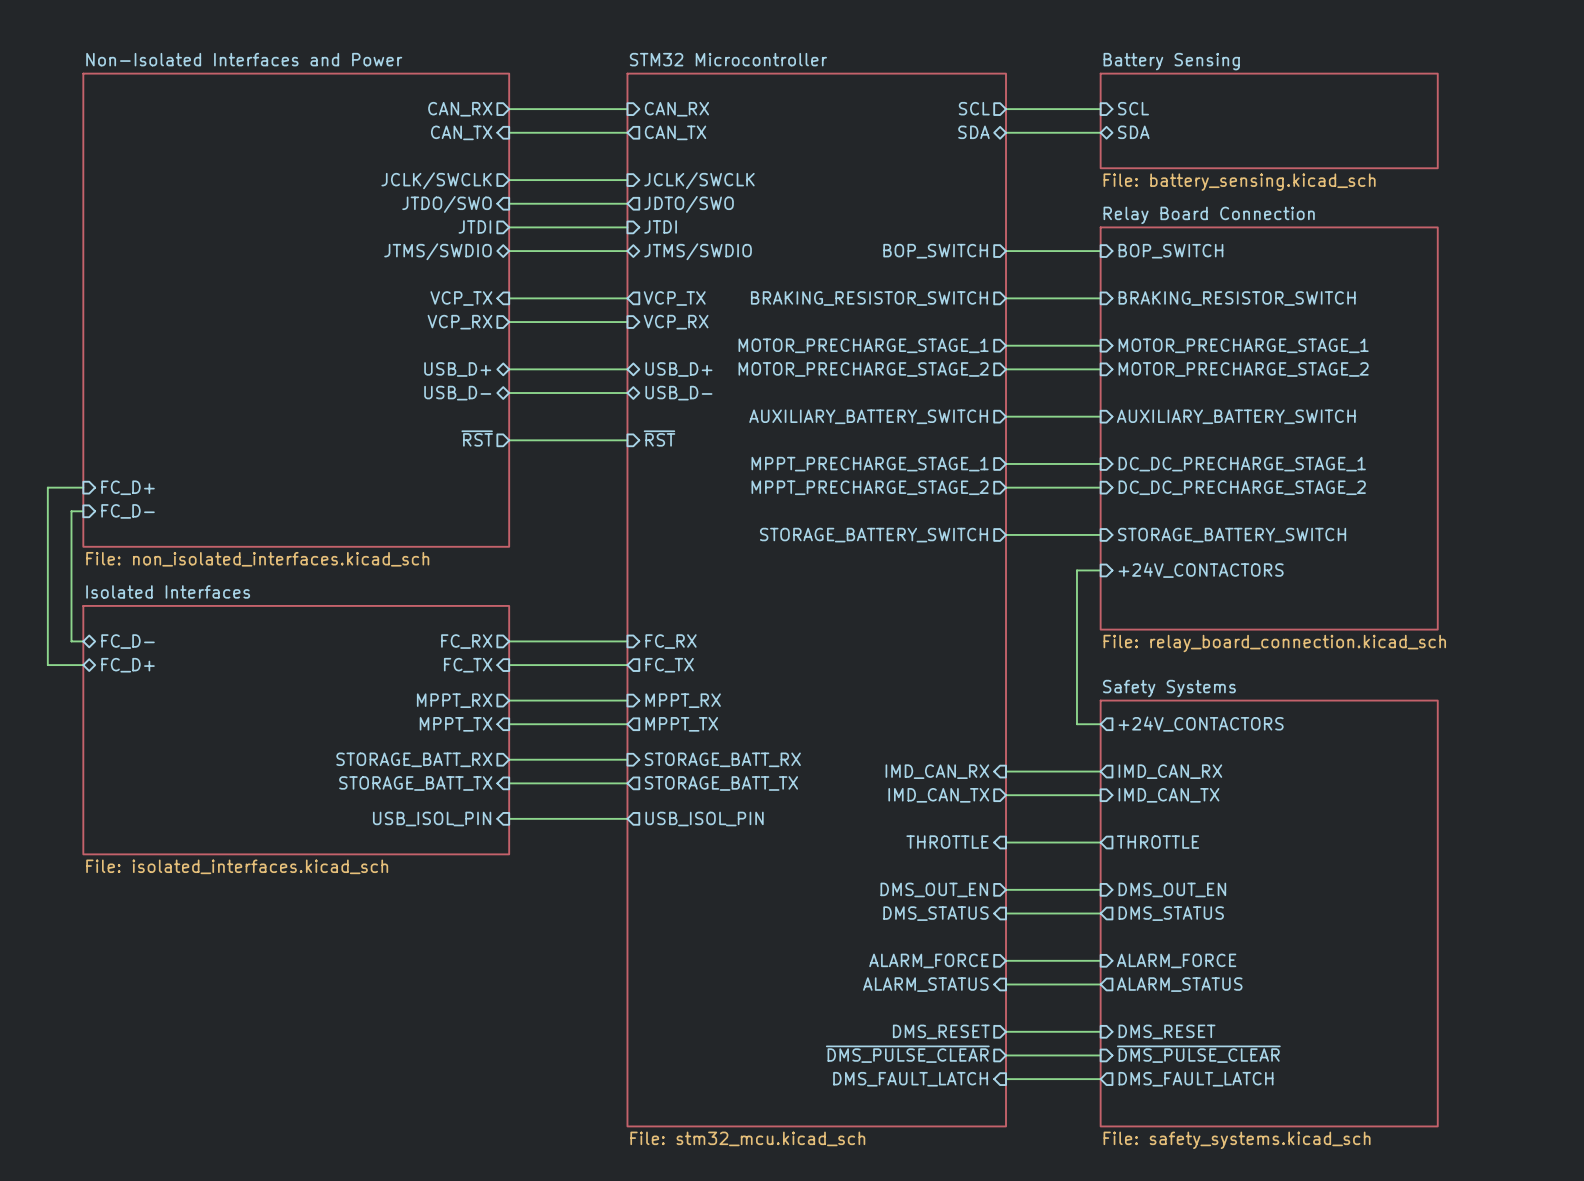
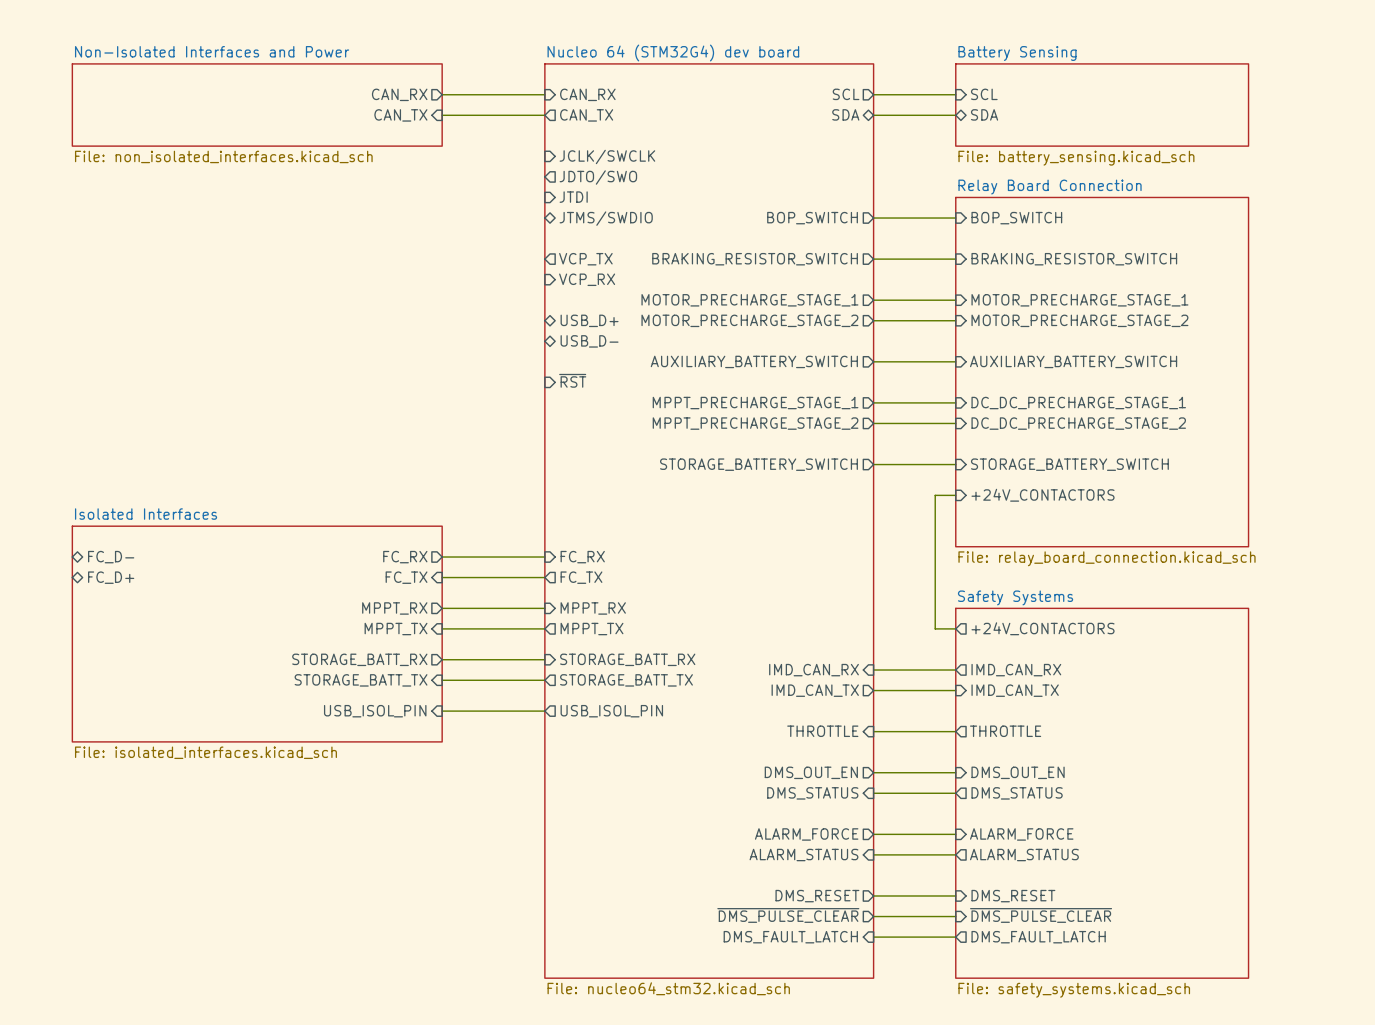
sheet STM32 Microcontroller name: STM32 Microcontroller (728, 59) -> Nucleo 64 (STM32G4) dev board (673, 53)
sheet Non-Isolated Interfaces and Power: none -> File: non_isolated_interfaces.kicad_sch (257, 105)
sheet pin: JCLK/SWCLK (436, 180) -> none
wire: (509, 180) (627, 180) -> none
wire: (509, 203) (627, 203) -> none
sheet pin: JTDO/SWO (447, 204) -> none
sheet pin: JTDI (474, 226) -> none
wire: (509, 227) (627, 227) -> none
sheet pin: JTMS/SWDIO (438, 251) -> none
wire: (509, 251) (627, 251) -> none
sheet pin: VCP_TX (461, 298) -> none
wire: (509, 298) (627, 298) -> none
sheet Non-Isolated Interfaces and Power: File: non_isolated_interfaces.kicad_sch (296, 310) -> none
sheet pin: VCP_RX (459, 322) -> none
wire: (509, 322) (627, 322) -> none
sheet pin: USB_D+ (457, 369) -> none
wire: (509, 369) (627, 369) -> none
sheet pin: USB_D- (457, 393) -> none
wire: (509, 393) (627, 393) -> none
sheet pin: ~{RST} (477, 438) -> none
wire: (509, 440) (627, 440) -> none
wire: (83, 487) (47, 487) (47, 665) (83, 665) -> none
sheet pin: FC_D+ (128, 487) -> none
wire: (83, 511) (71, 511) (71, 641) (83, 641) -> none
sheet pin: FC_D- (128, 511) -> none
sheet STM32 Microcontroller value: File: stm32_mcu.kicad_sch (747, 1138) -> File: nucleo64_stm32.kicad_sch (668, 988)

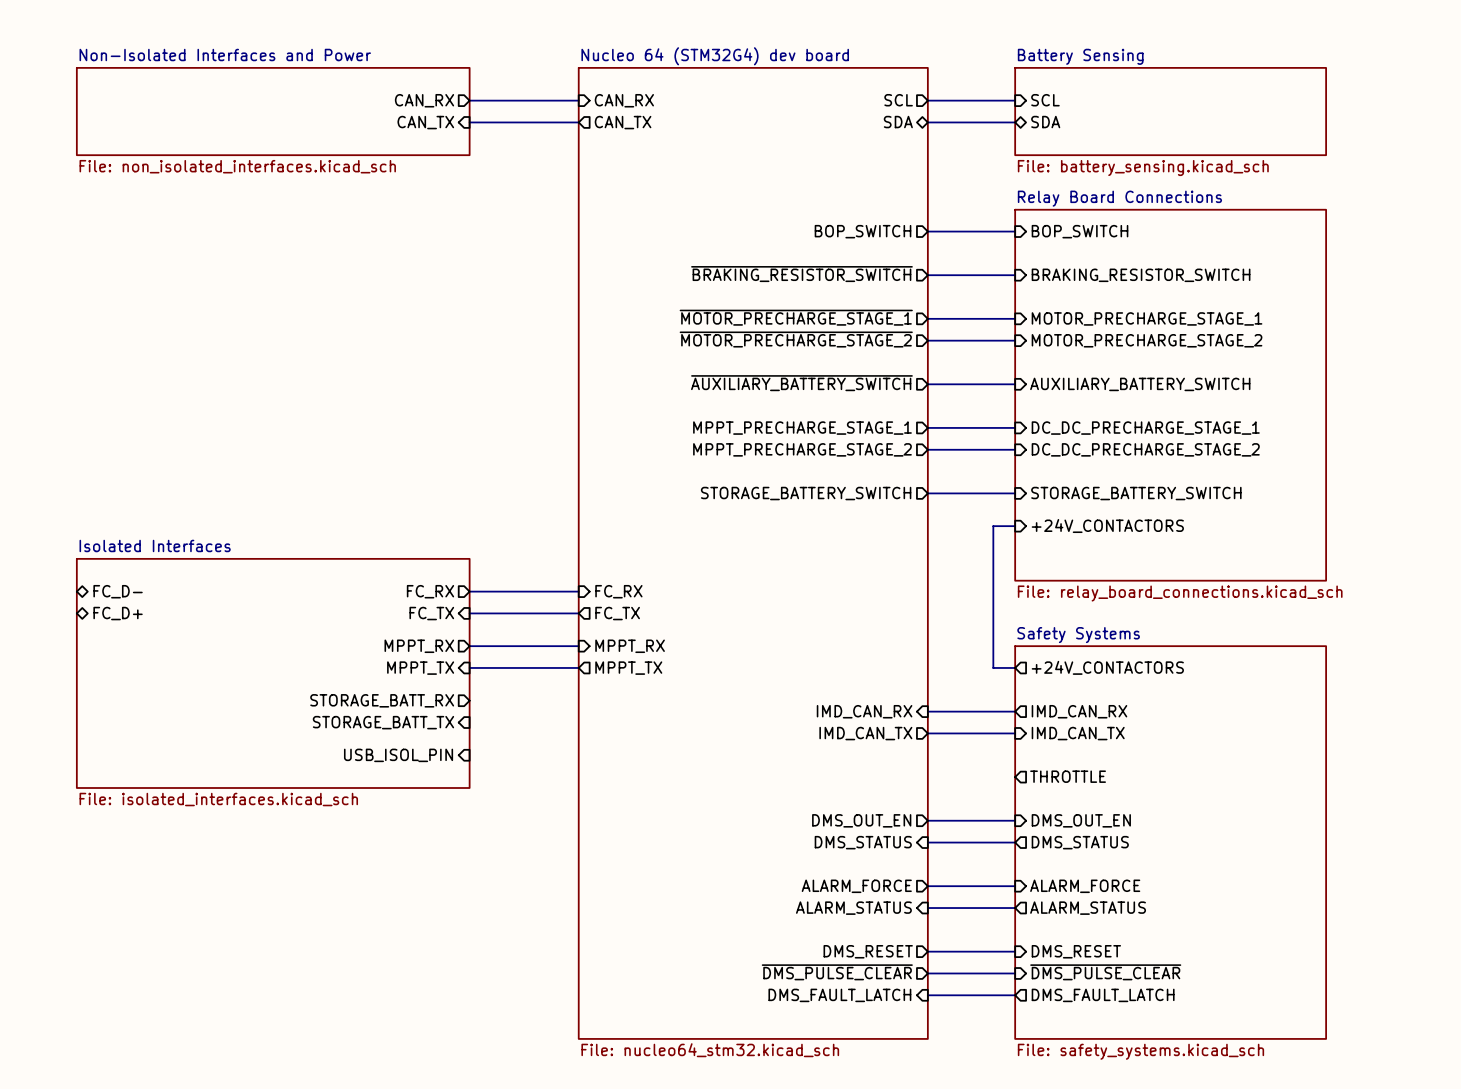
sheet pin: JCLK/SWCLK (607, 156) -> none
sheet pin: JDTO/SWO (598, 177) -> none
sheet Relay Board Connection name: Relay Board Connection (1050, 187) -> Relay Board Connections (1119, 198)
sheet pin: JTDI (573, 197) -> none
sheet pin: JTMS/SWDIO (606, 218) -> none
sheet pin: VCP_TX (585, 259) -> none
sheet pin: BRAKING_RESISTOR_SWITCH (755, 259) -> ~{BRAKING_RESISTOR_SWITCH} (801, 274)
sheet pin: VCP_RX (587, 279) -> none
sheet pin: MOTOR_PRECHARGE_STAGE_1 (749, 300) -> ~{MOTOR_PRECHARGE_STAGE_1} (796, 317)
sheet pin: USB_D+ (589, 320) -> none
sheet pin: MOTOR_PRECHARGE_STAGE_2 (749, 320) -> ~{MOTOR_PRECHARGE_STAGE_2} (796, 339)
sheet pin: USB_D- (589, 341) -> none
sheet pin: AUXILIARY_BATTERY_SWITCH (754, 361) -> ~{AUXILIARY_BATTERY_SWITCH} (801, 383)
sheet pin: ~{RST} (572, 380) -> none
sheet Relay Board Connection value: File: relay_board_connection.kicad_sch (1107, 558) -> File: relay_board_connections.kicad_sch (1180, 593)
wire: (442, 659) (544, 659) -> none
sheet pin: STORAGE_BATT_RX (627, 659) -> none
wire: (442, 680) (544, 680) -> none
sheet pin: STORAGE_BATT_TX (626, 680) -> none
wire: (442, 711) (544, 711) -> none
sheet pin: USB_ISOL_PIN (611, 711) -> none
sheet pin: THROTTLE (822, 731) -> none
wire: (873, 731) (955, 731) -> none

